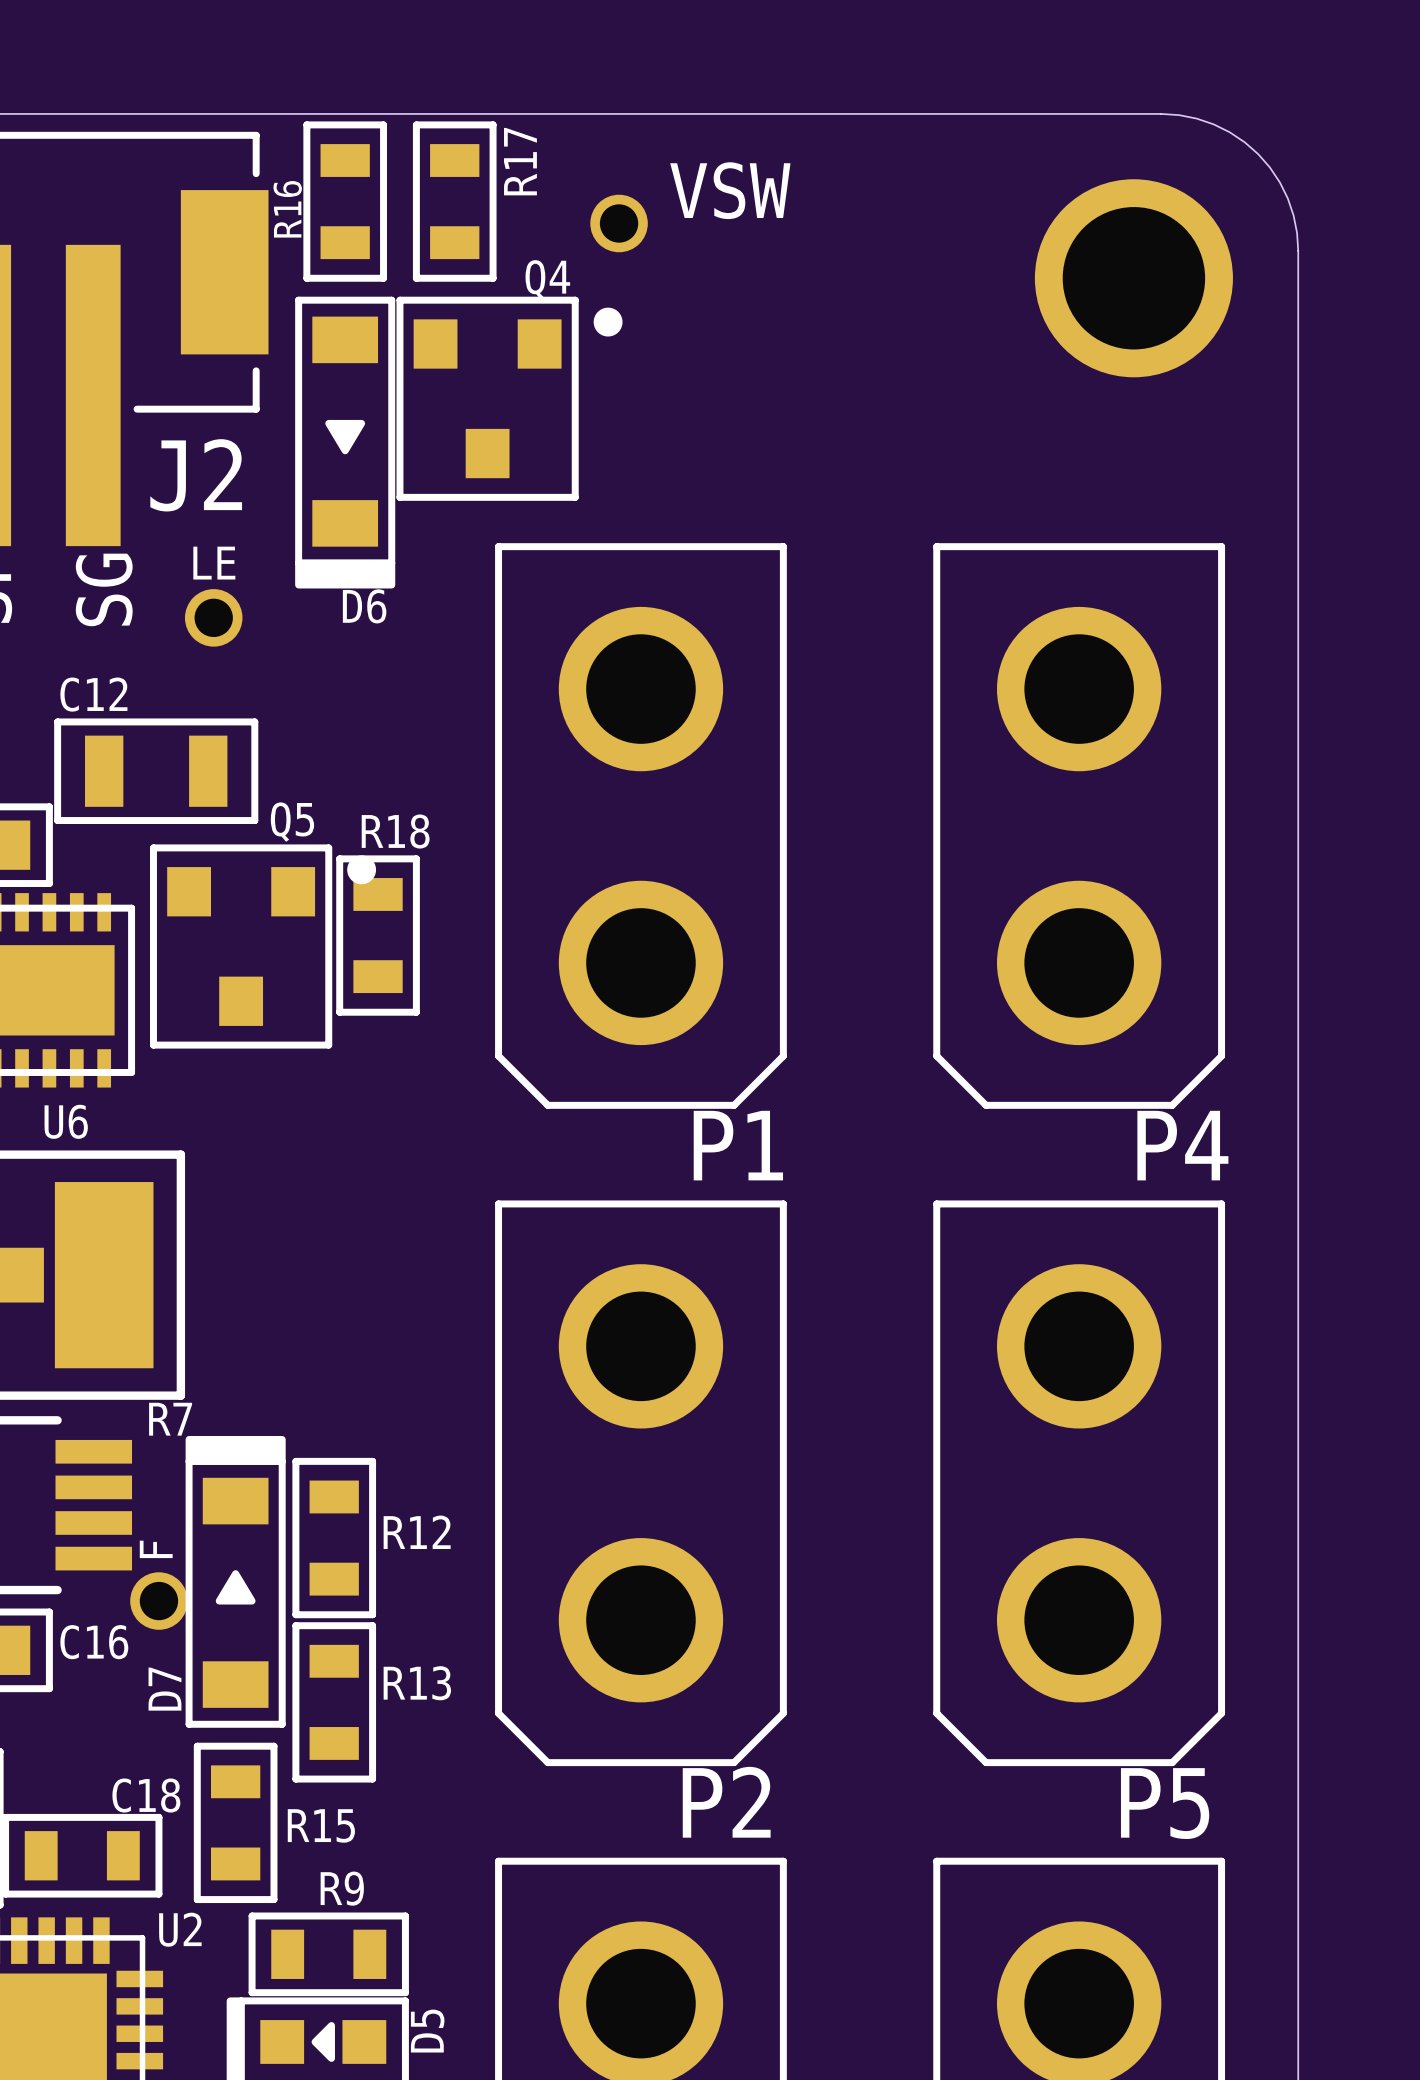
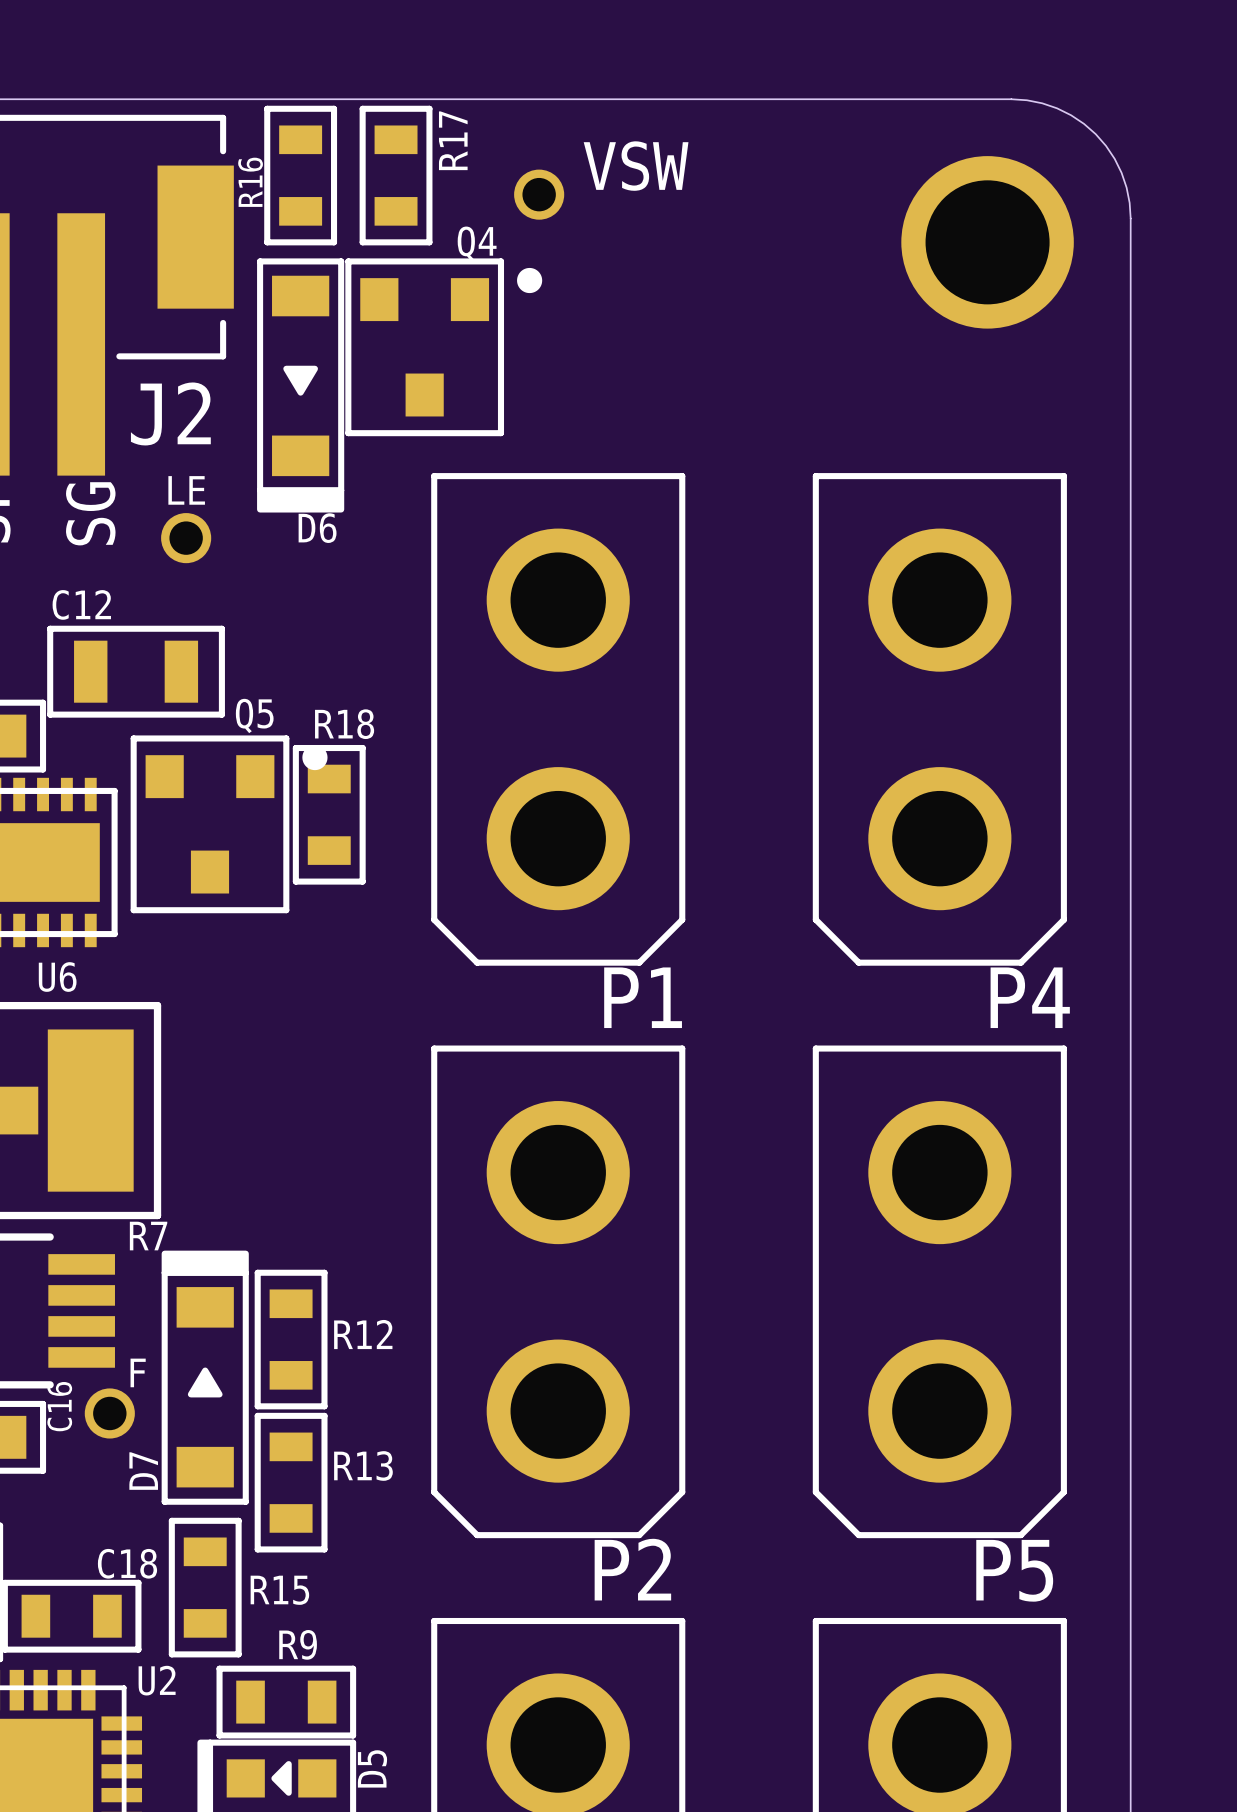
text rotation: 0° (156, 1549) -> 90° clockwise (138, 1372)
part position: (158, 1601) -> (109, 1413)
C16 name rotation: 0° (94, 1642) -> 90° counterclockwise (59, 1406)

